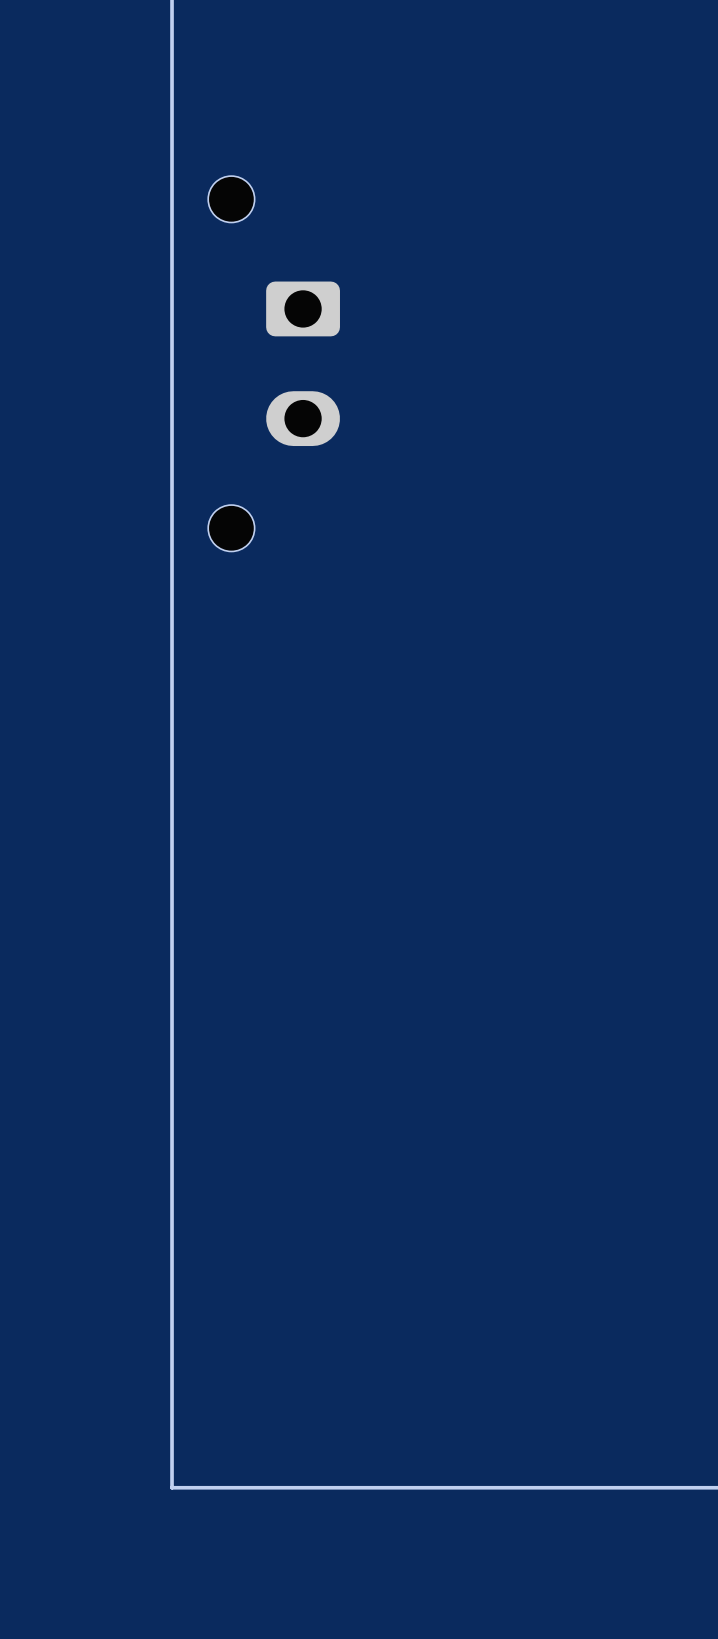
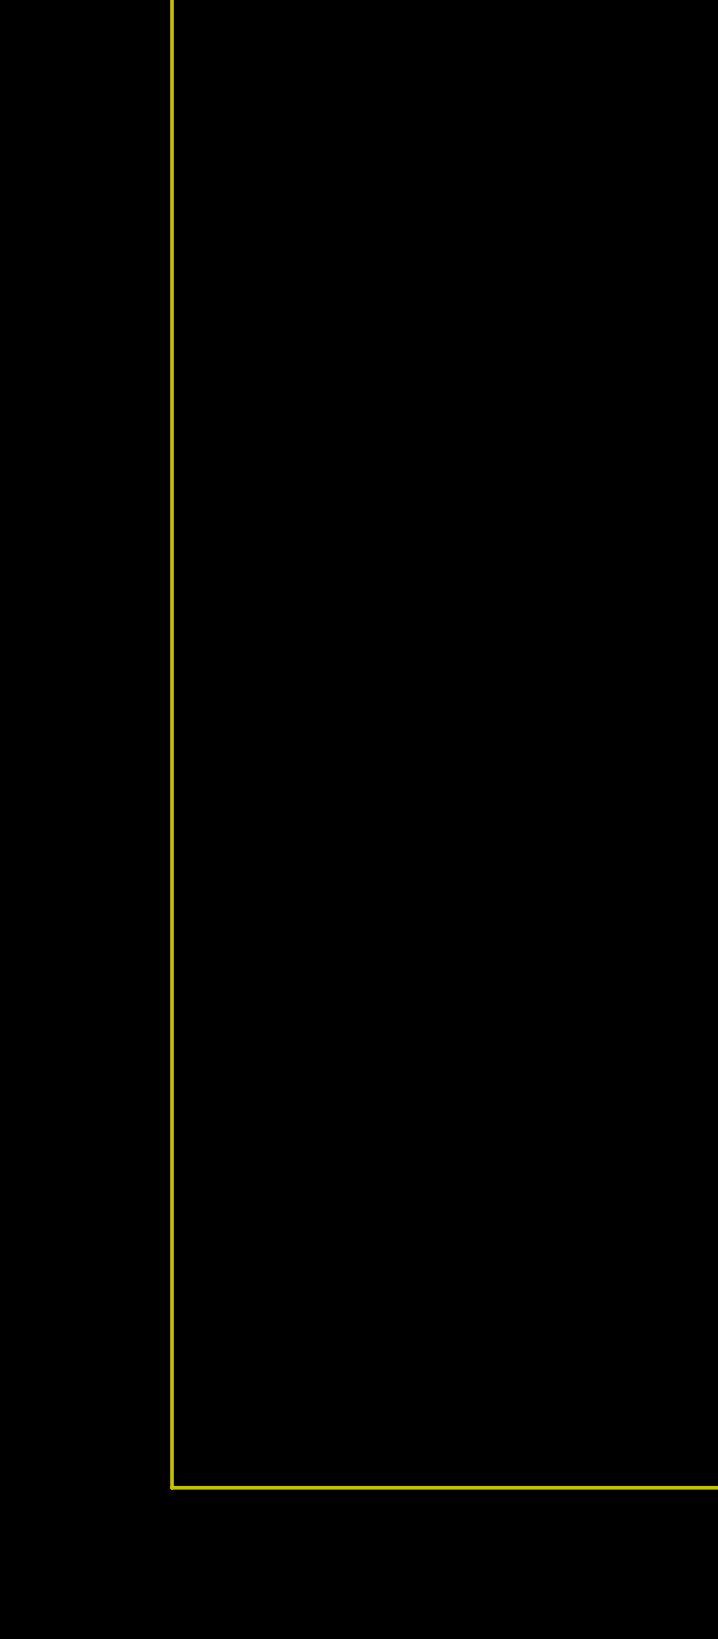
part: (274, 363) -> none

